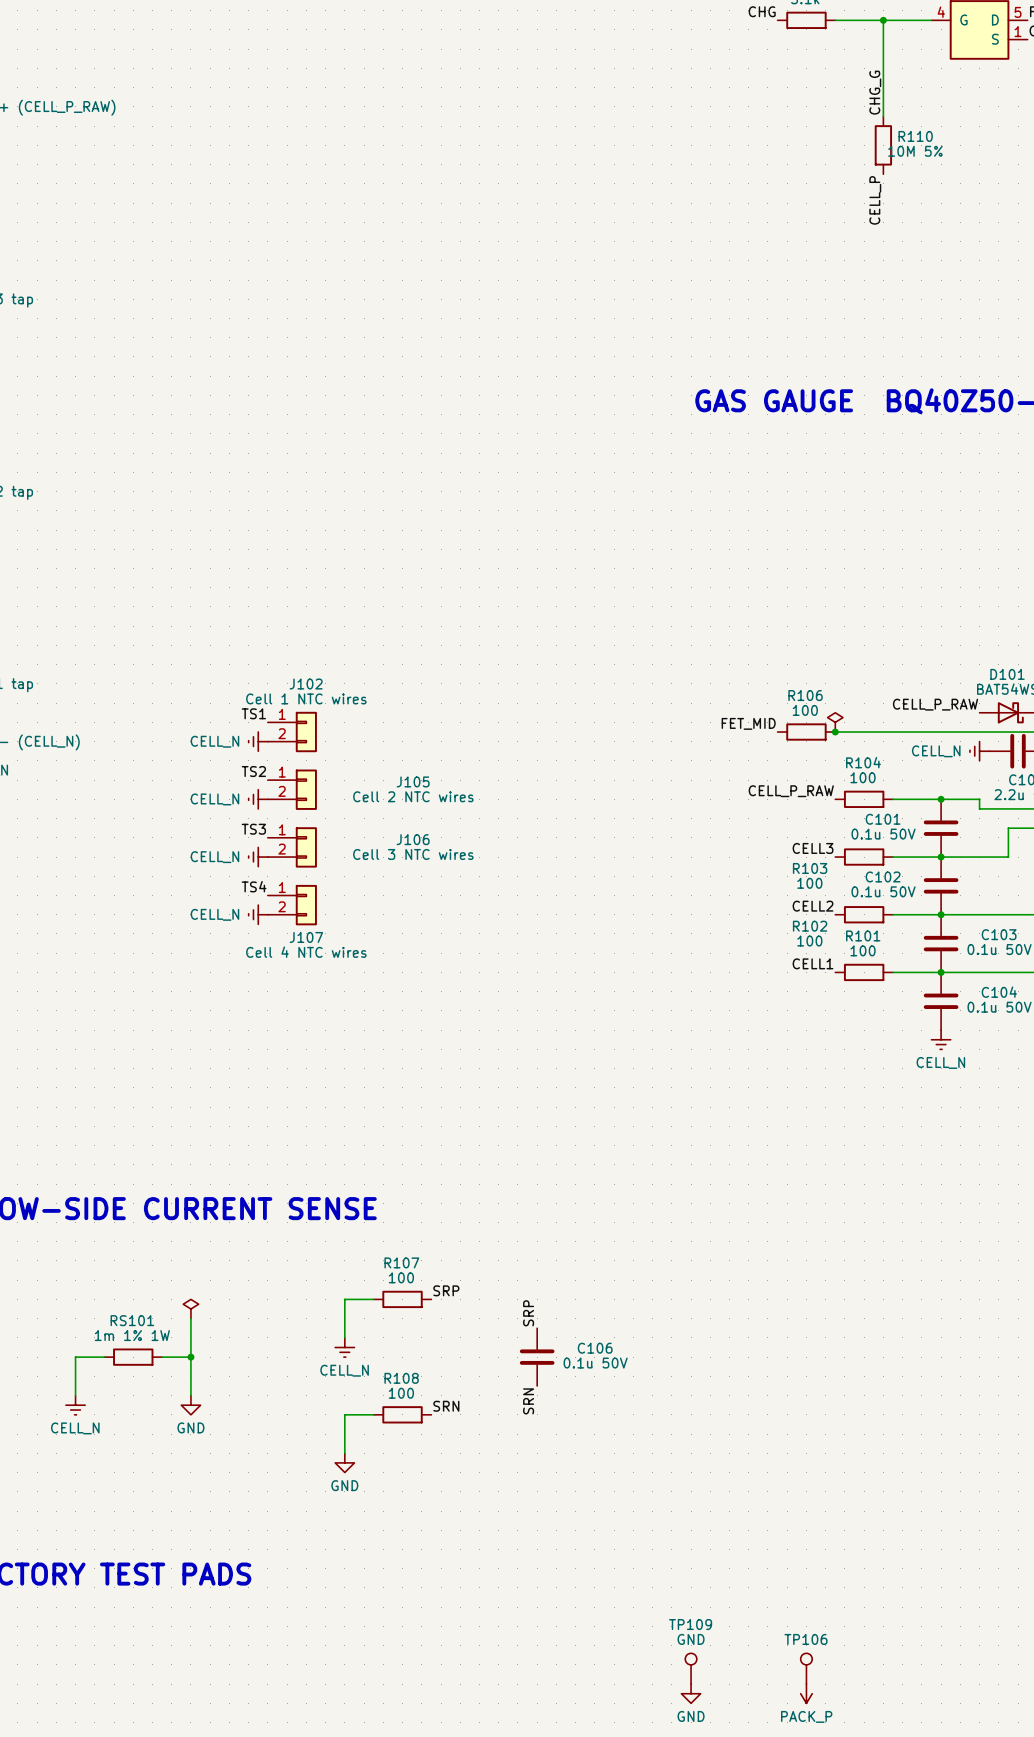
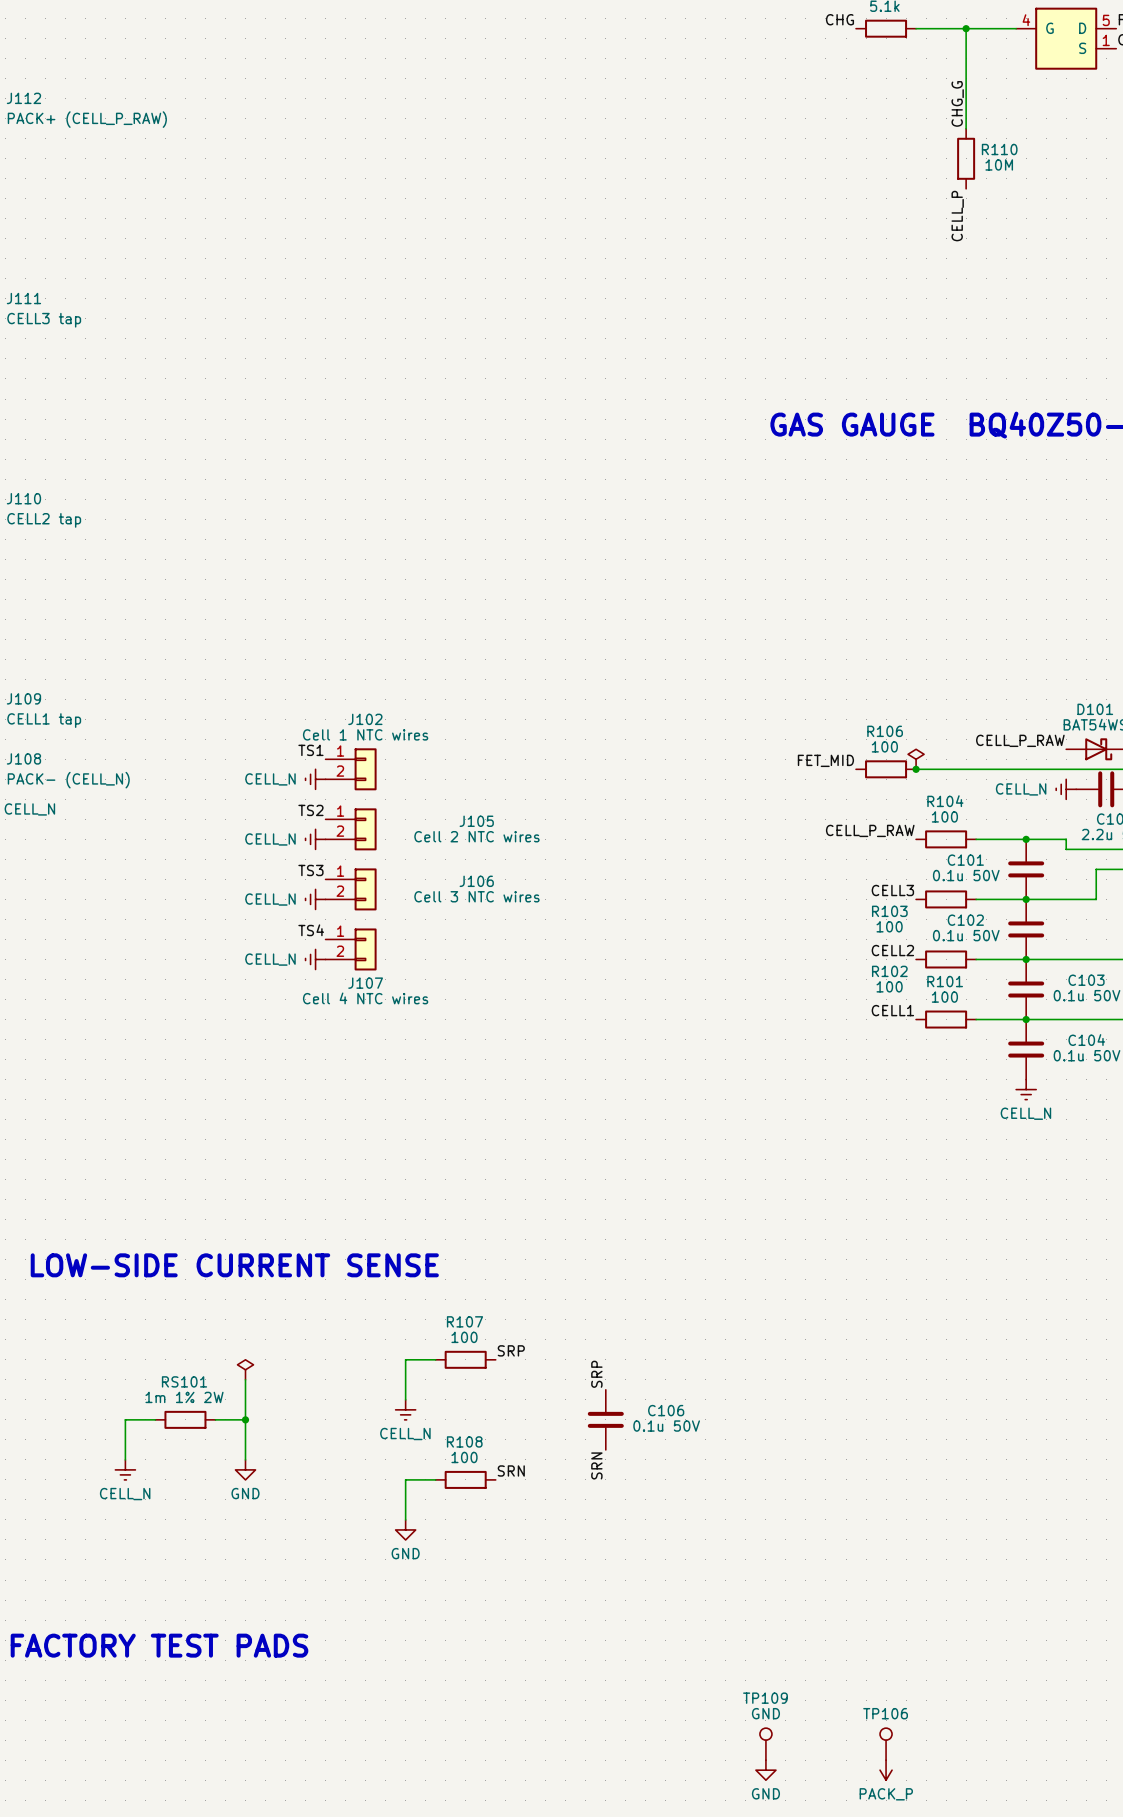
R110 value: 10M 5% (915, 151) -> 10M (999, 164)
RS101 value: 1m 1% 1W (132, 1335) -> 1m 1% 2W (184, 1397)

